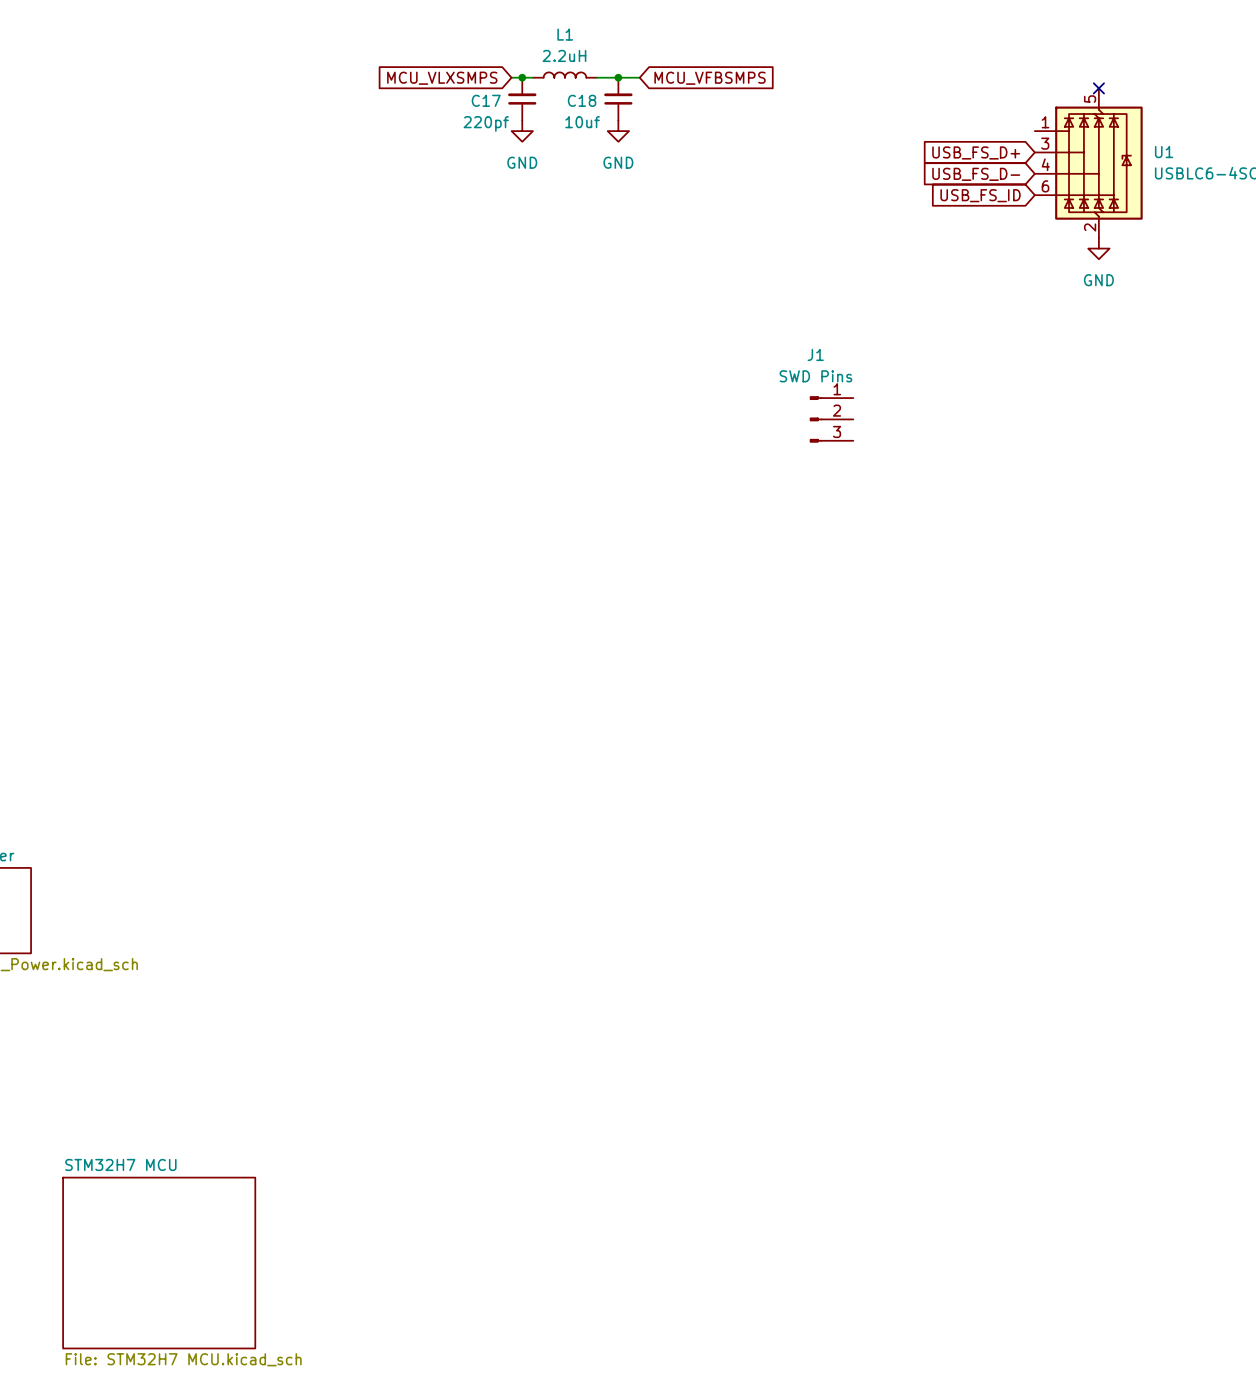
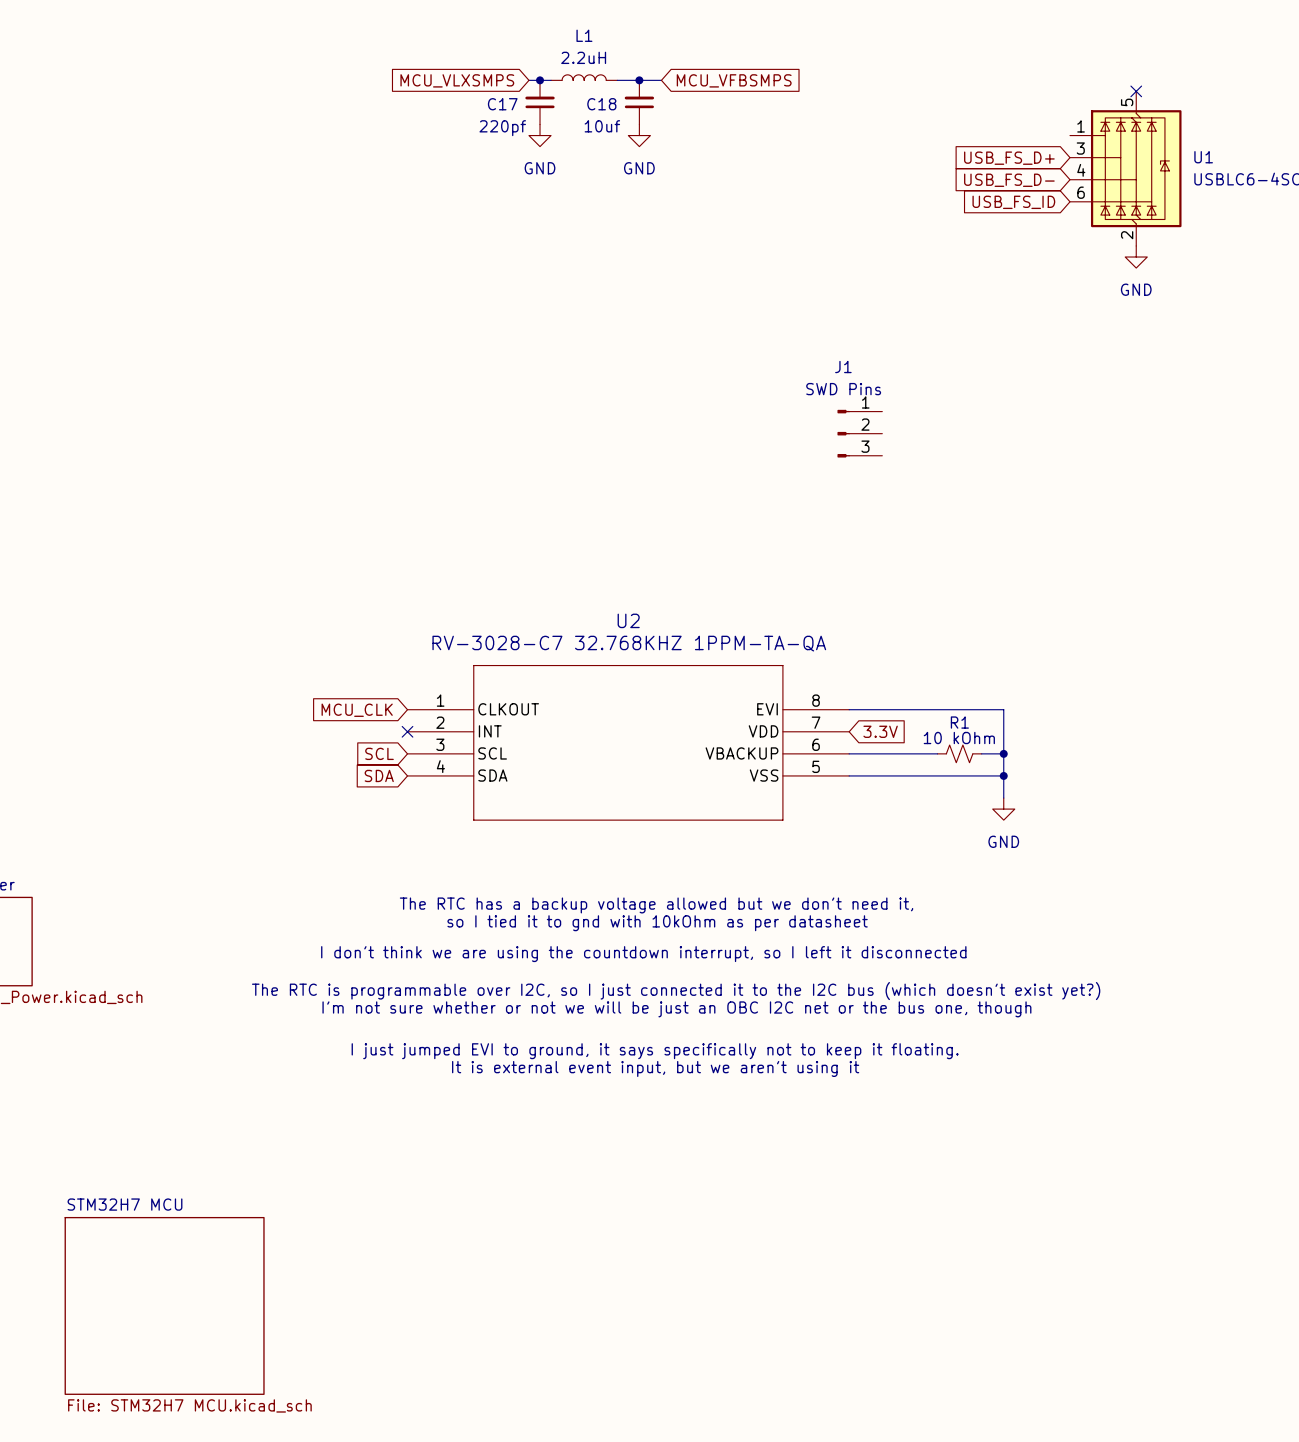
global label: none -> MCU_CLK (357, 710)
wire: none -> (849, 709) (1003, 709) (1003, 798)
no-connect mark: none -> (407, 731)
global label: none -> 3.3V (880, 731)
U2: none -> RV-3028-C7 32.768KHZ 1PPM-TA-QA (628, 742)
global label: none -> SCL (379, 753)
wire: none -> (849, 753) (937, 753)
R1: none -> 10 kOhm (959, 753)
wire: none -> (981, 753) (1003, 753)
junction: none -> (1003, 753)
global label: none -> SDA (379, 775)
wire: none -> (849, 775) (1003, 775)
junction: none -> (1003, 775)
power symbol: none -> GND (1003, 809)
text: none -> The RTC has a backup voltage allowed but we don't need it, (656, 905)
text: none -> so I tied it to gnd with 10kOhm as per datasheet (657, 923)
text: none -> I don't think we are using the countdown interrupt, so I left it disconnected (643, 954)
text: none -> The RTC is programmable over I2C, so I just connected it to the I2C bus (which doesn't exist yet?) (676, 991)
text: none -> I'm not sure whether or not we will be just an OBC I2C net or the bus one, though (676, 1009)
text: none -> I just jumped EVI to ground, it says specifically not to keep it floating. (655, 1051)
text: none -> It is external event input, but we aren't using it (655, 1068)

